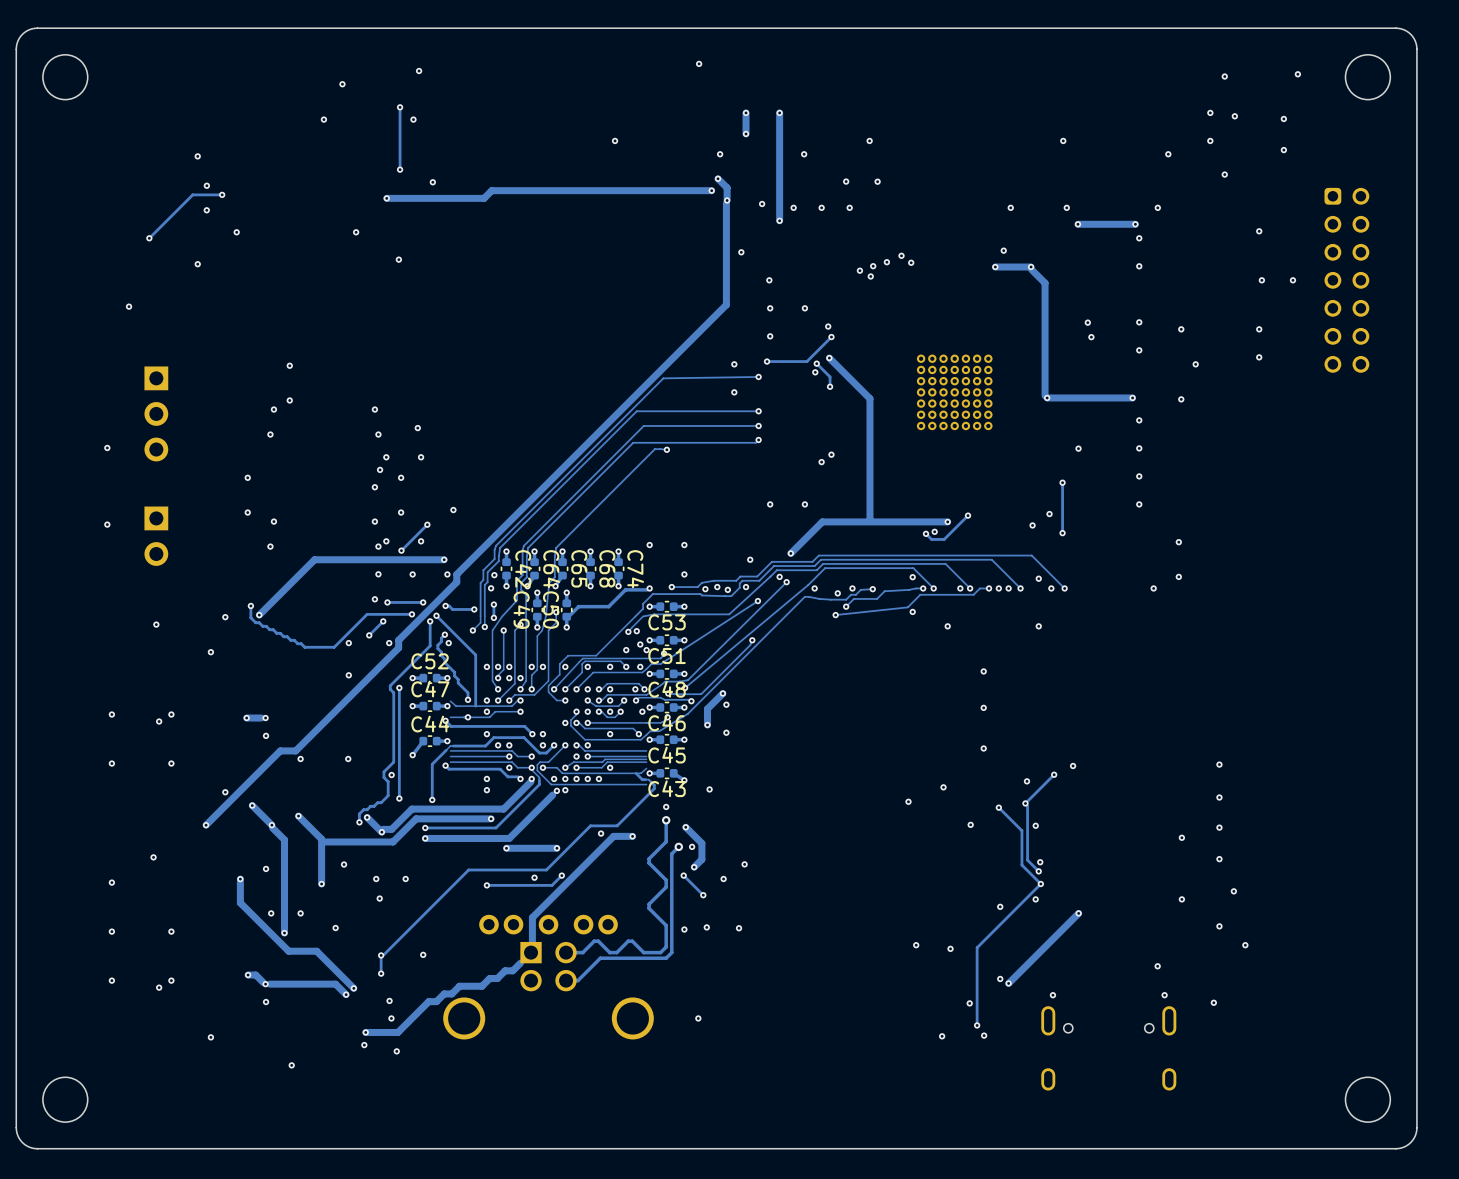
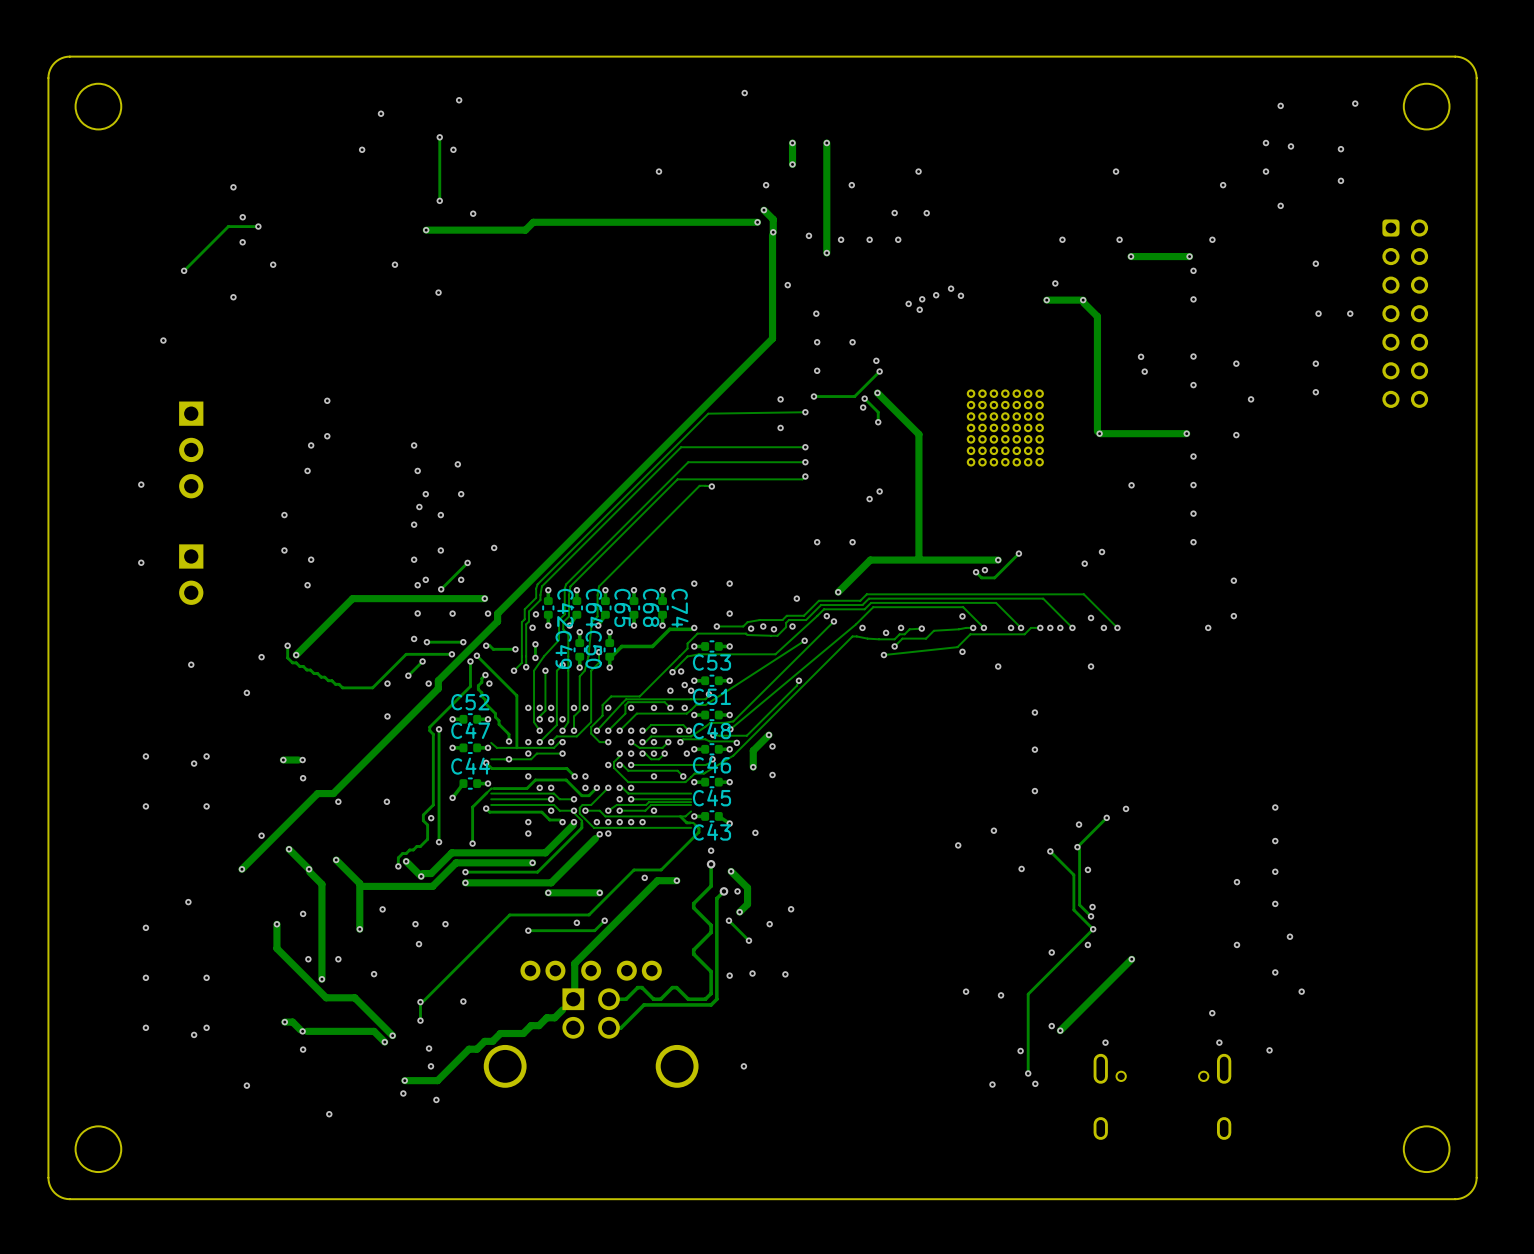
track: (1062, 482) (1062, 533) -> none
via: (1062, 482) -> none
via: (1062, 533) -> none

